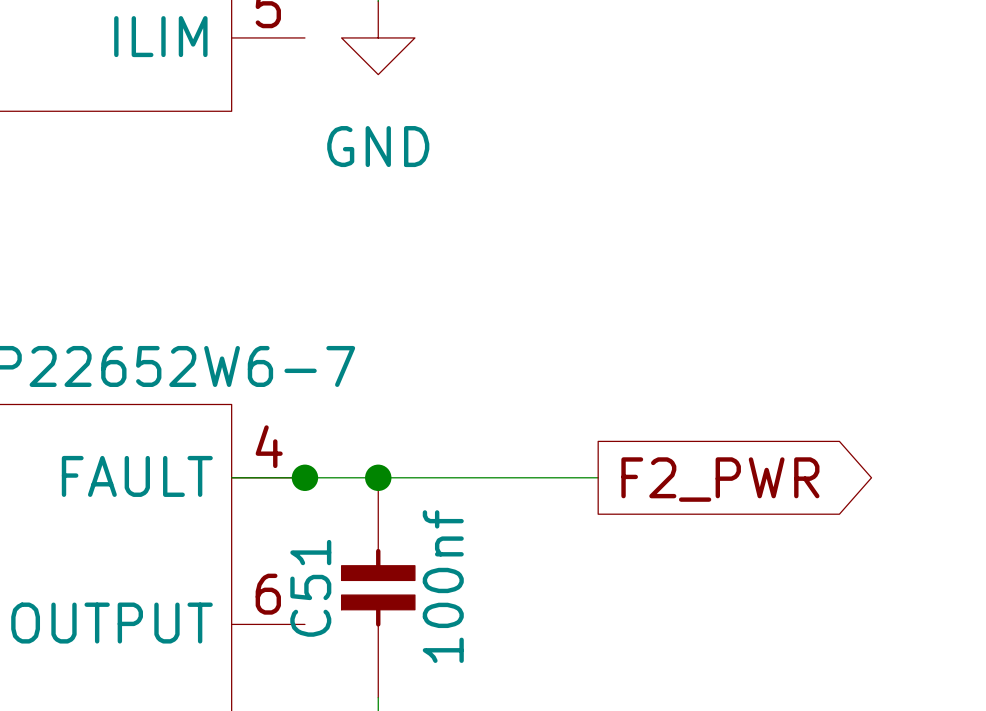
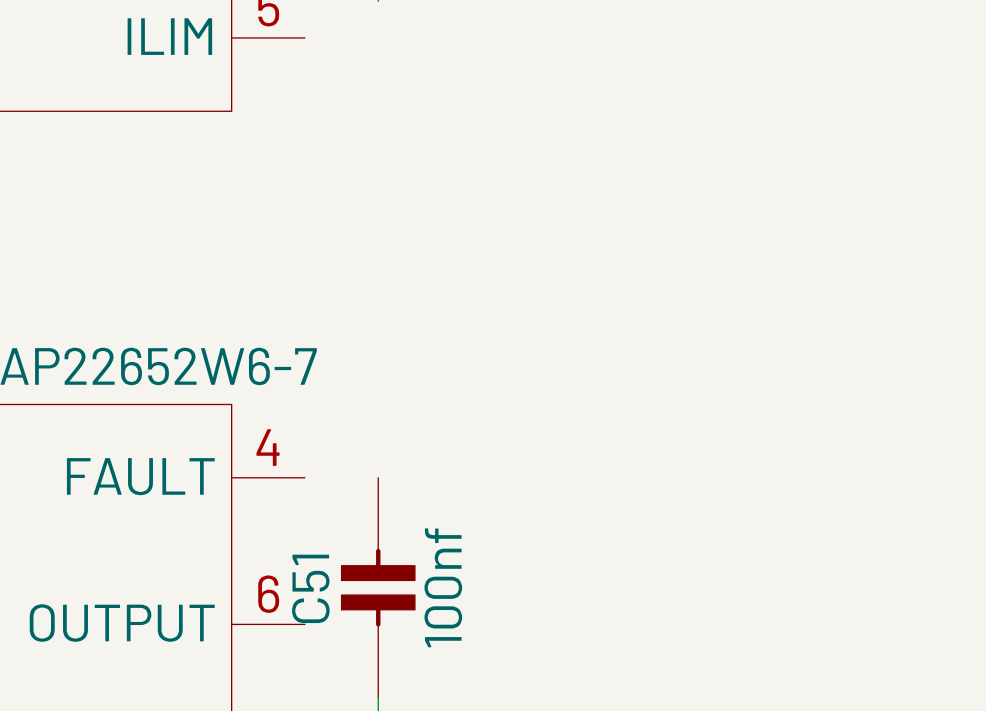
power symbol: GND (378, 37) -> none
wire: (231, 477) (598, 477) -> none
junction: (304, 477) -> none
junction: (378, 477) -> none
global label: F2_PWR (720, 479) -> none

